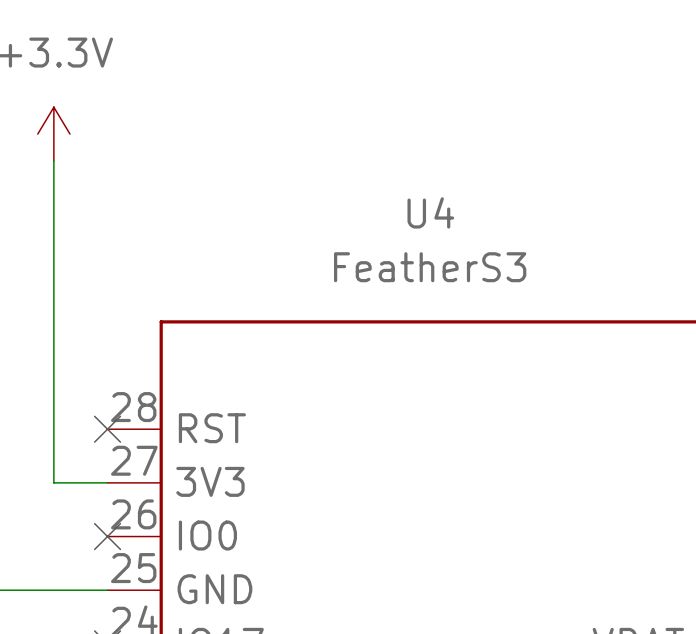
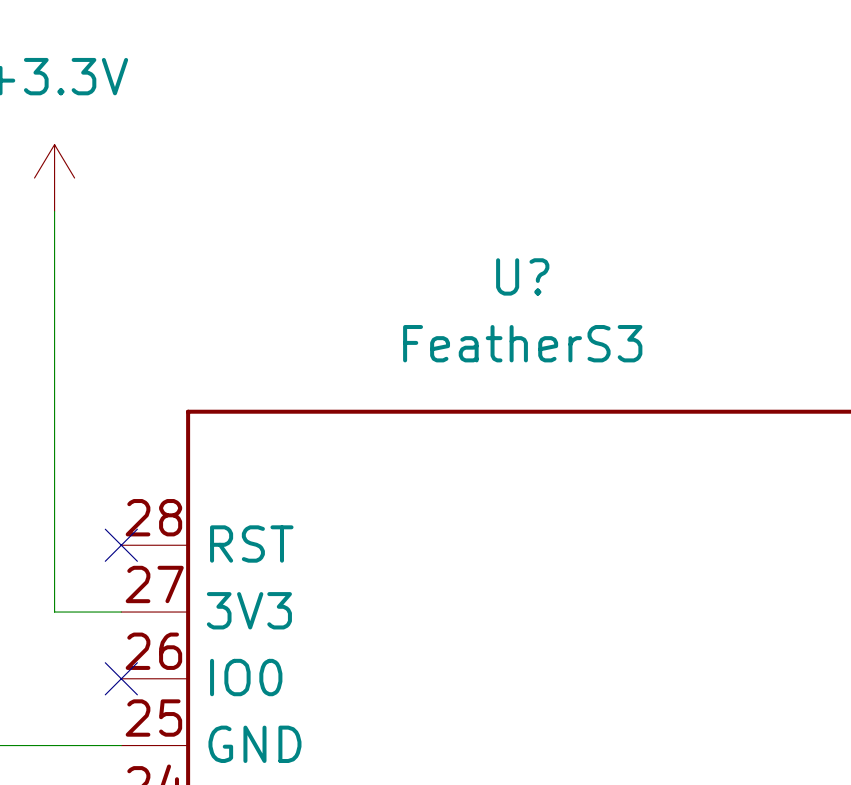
U4 name: U4 (430, 212) -> U? (522, 276)

